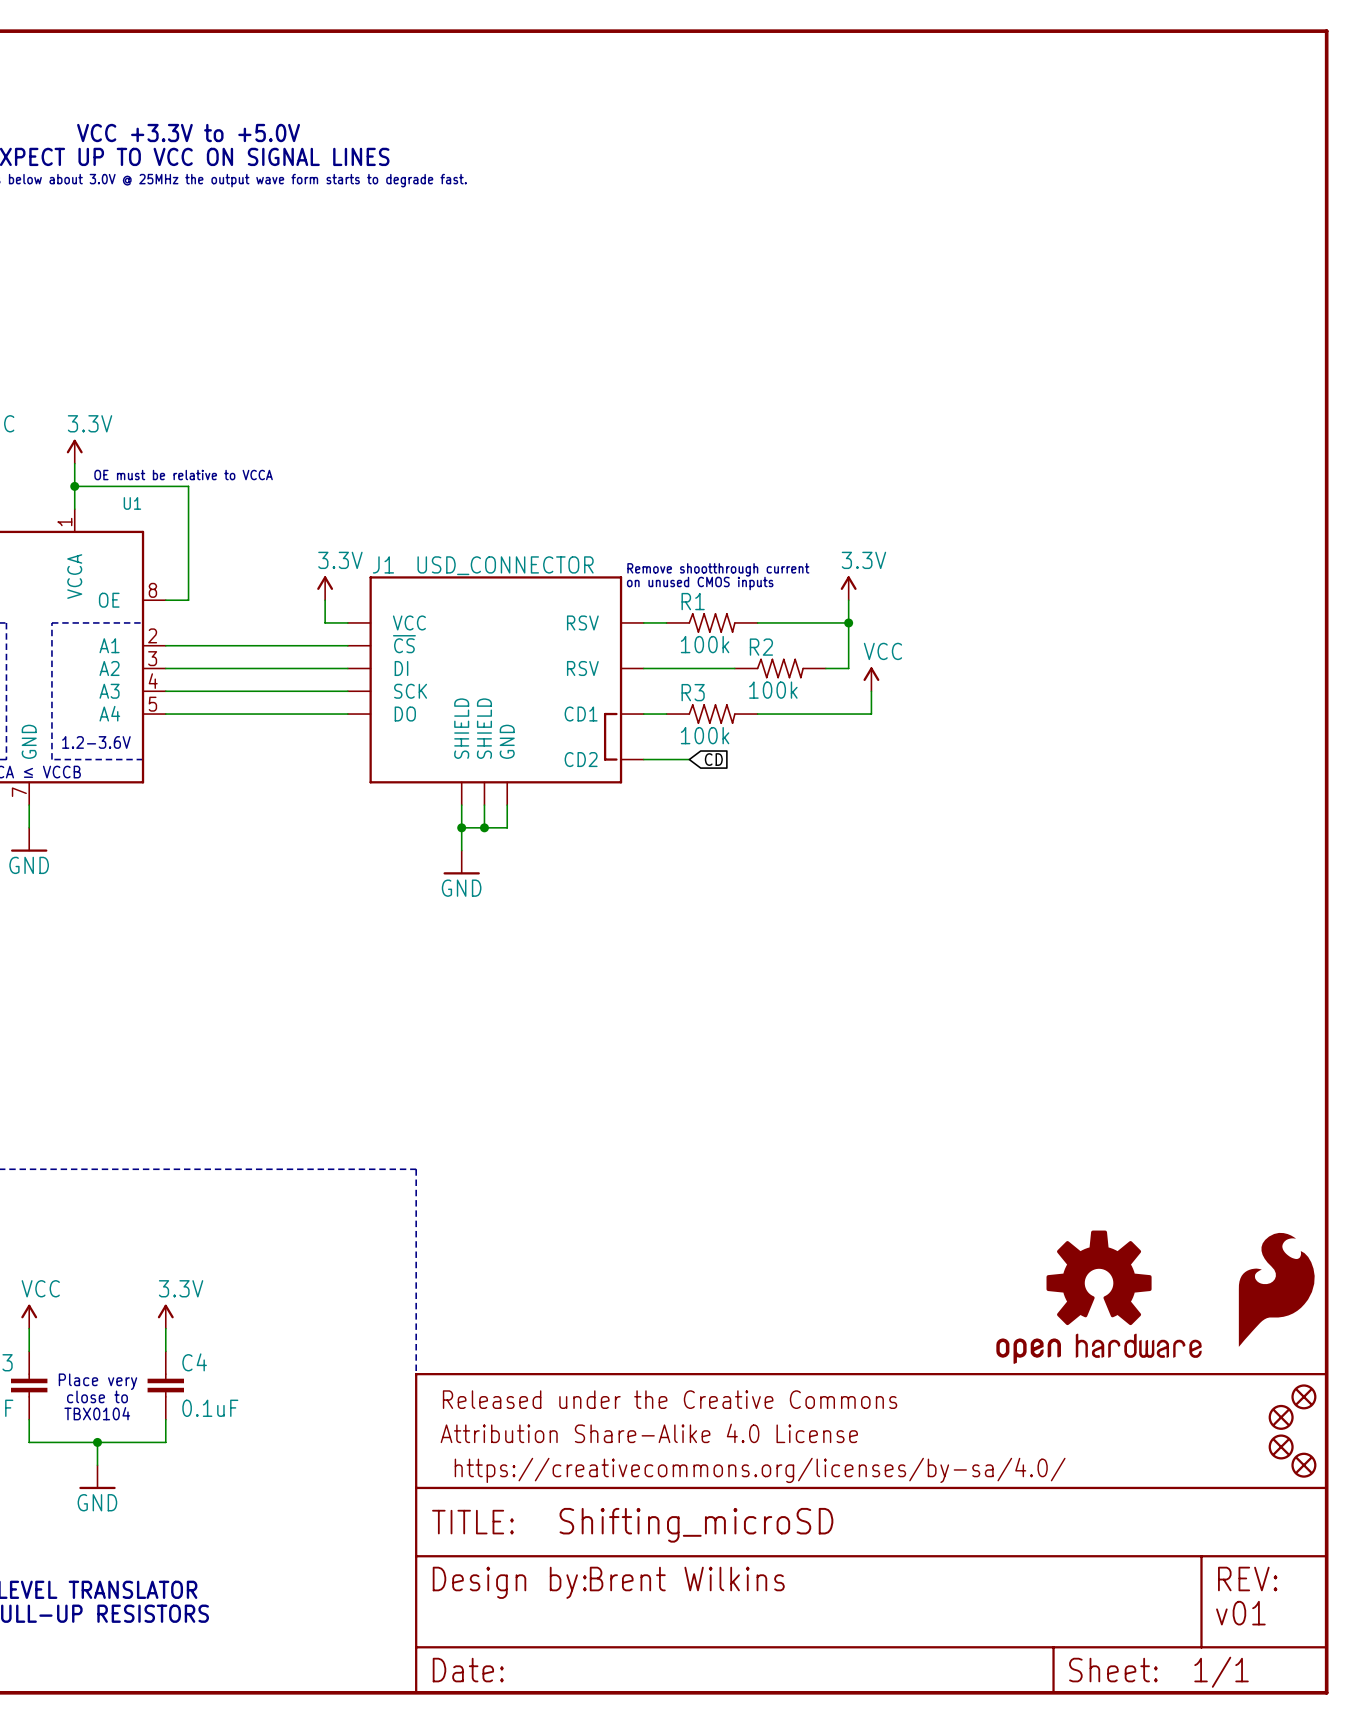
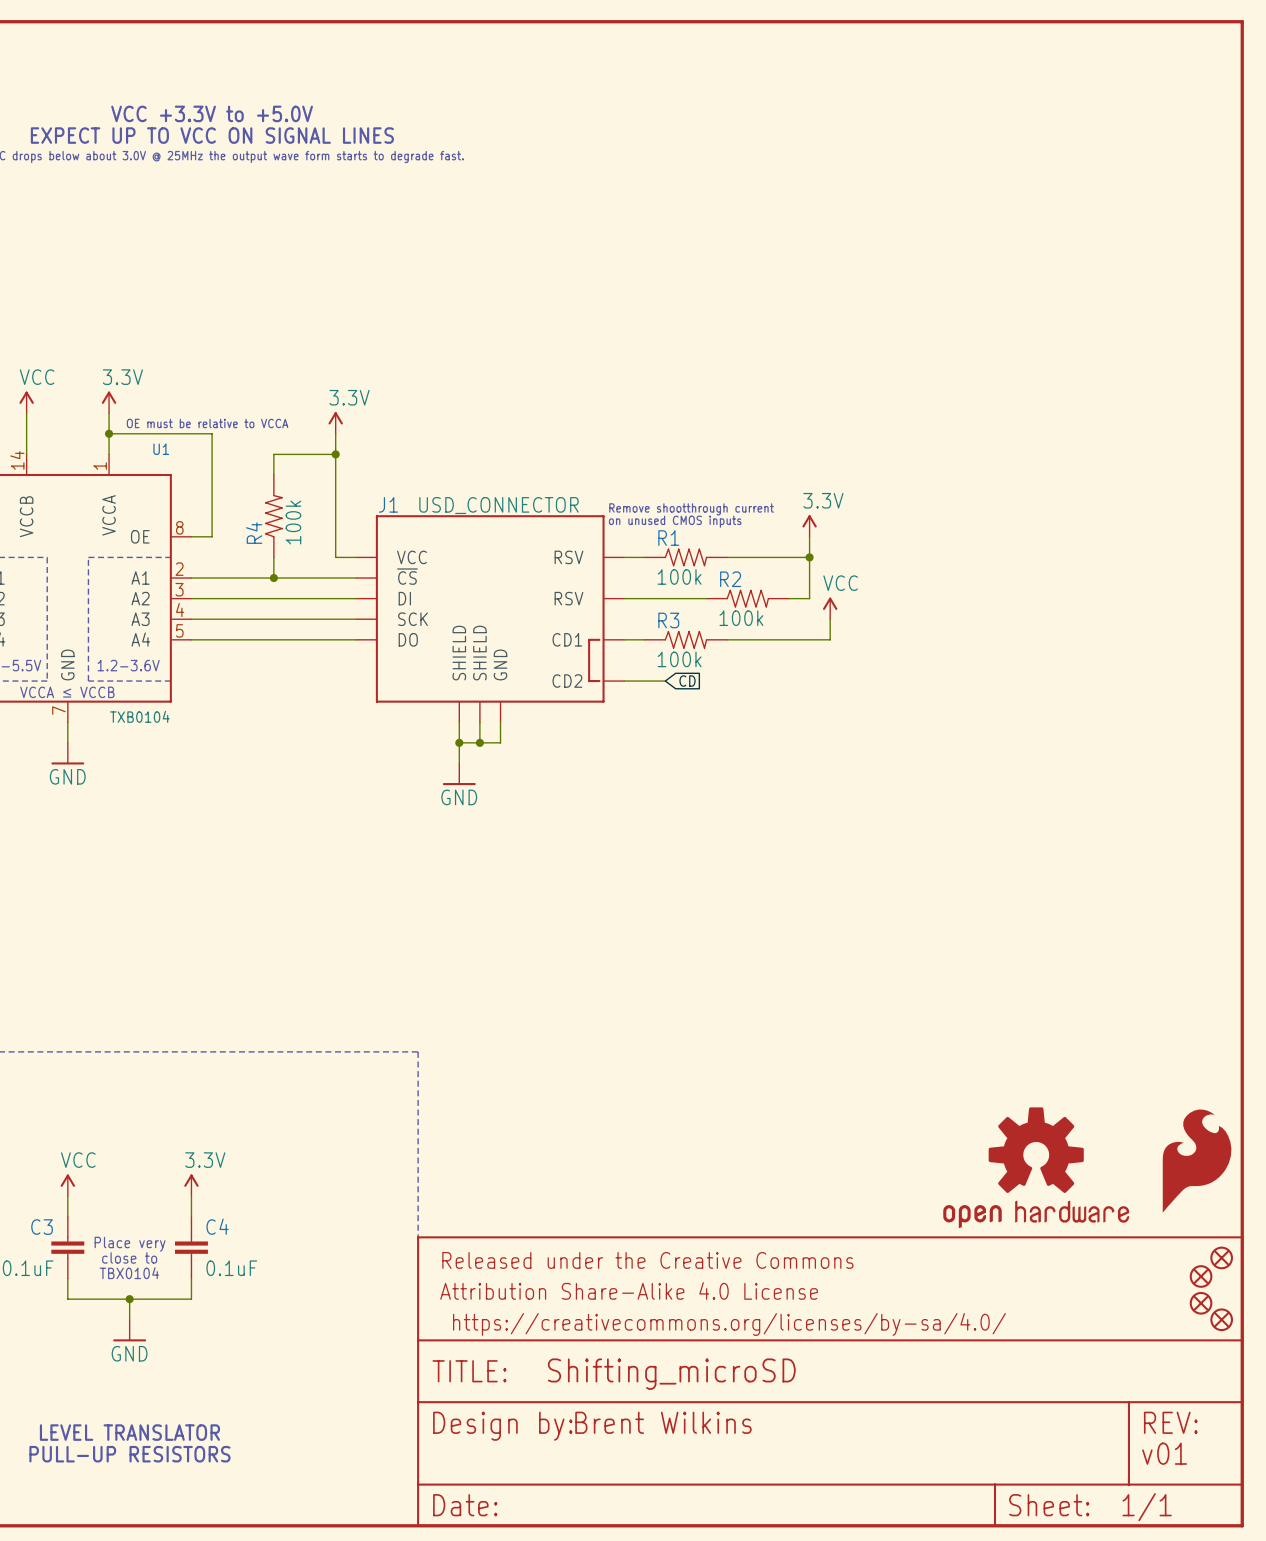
wire: none -> (335, 433) (335, 536)
wire: none -> (335, 454) (273, 454) (273, 475)
junction: none -> (335, 454)
R4: none -> 100k (273, 516)
power symbol position: 3.3V (325, 588) -> 3.3V (335, 422)
wire: none -> (273, 557) (273, 578)
junction: none -> (273, 578)
U1 value: none -> TXB0104 (139, 716)

